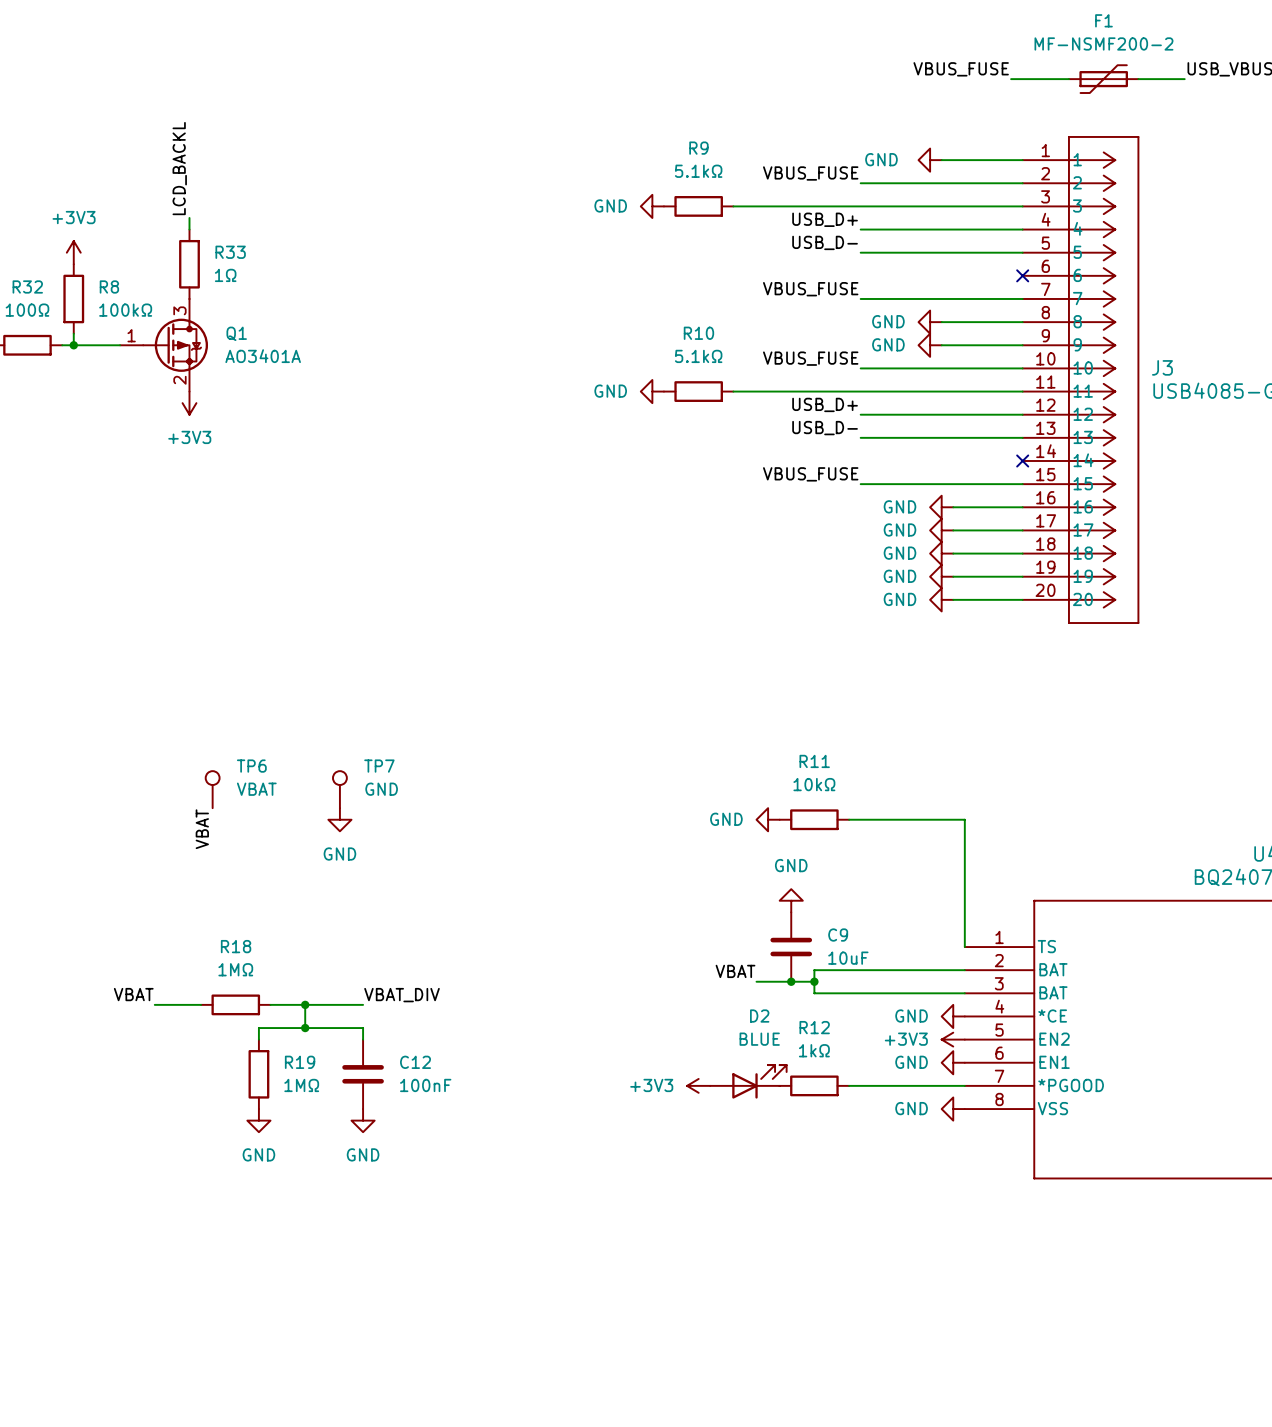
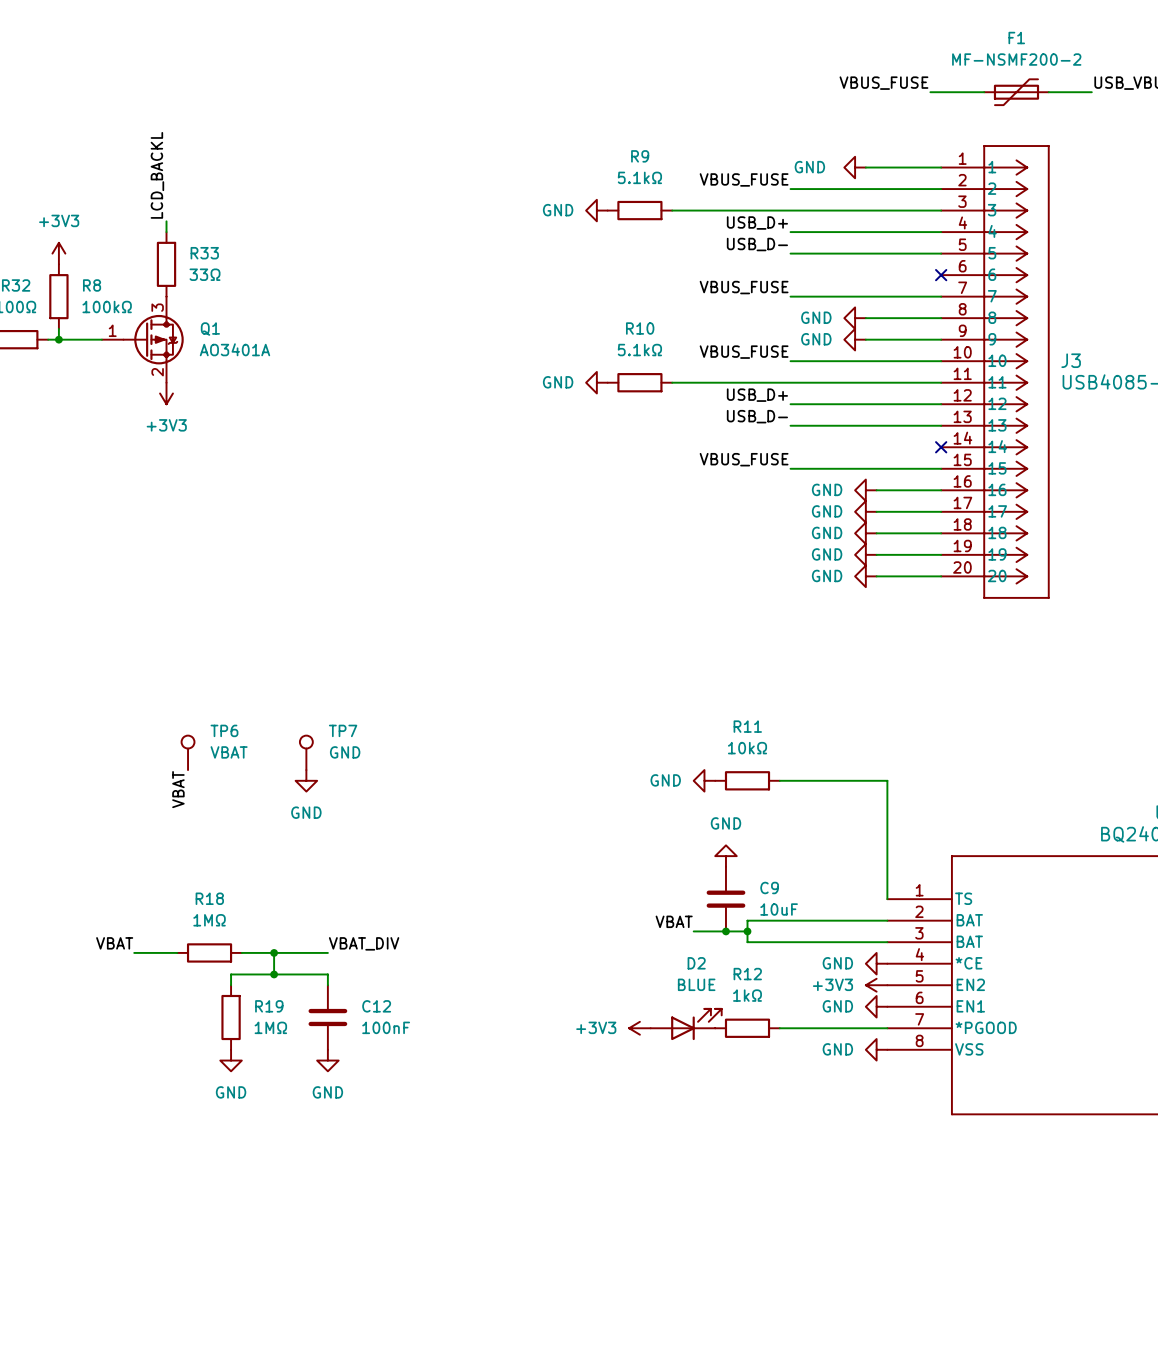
R33 value: 1Ω (225, 275) -> 33Ω (205, 274)

